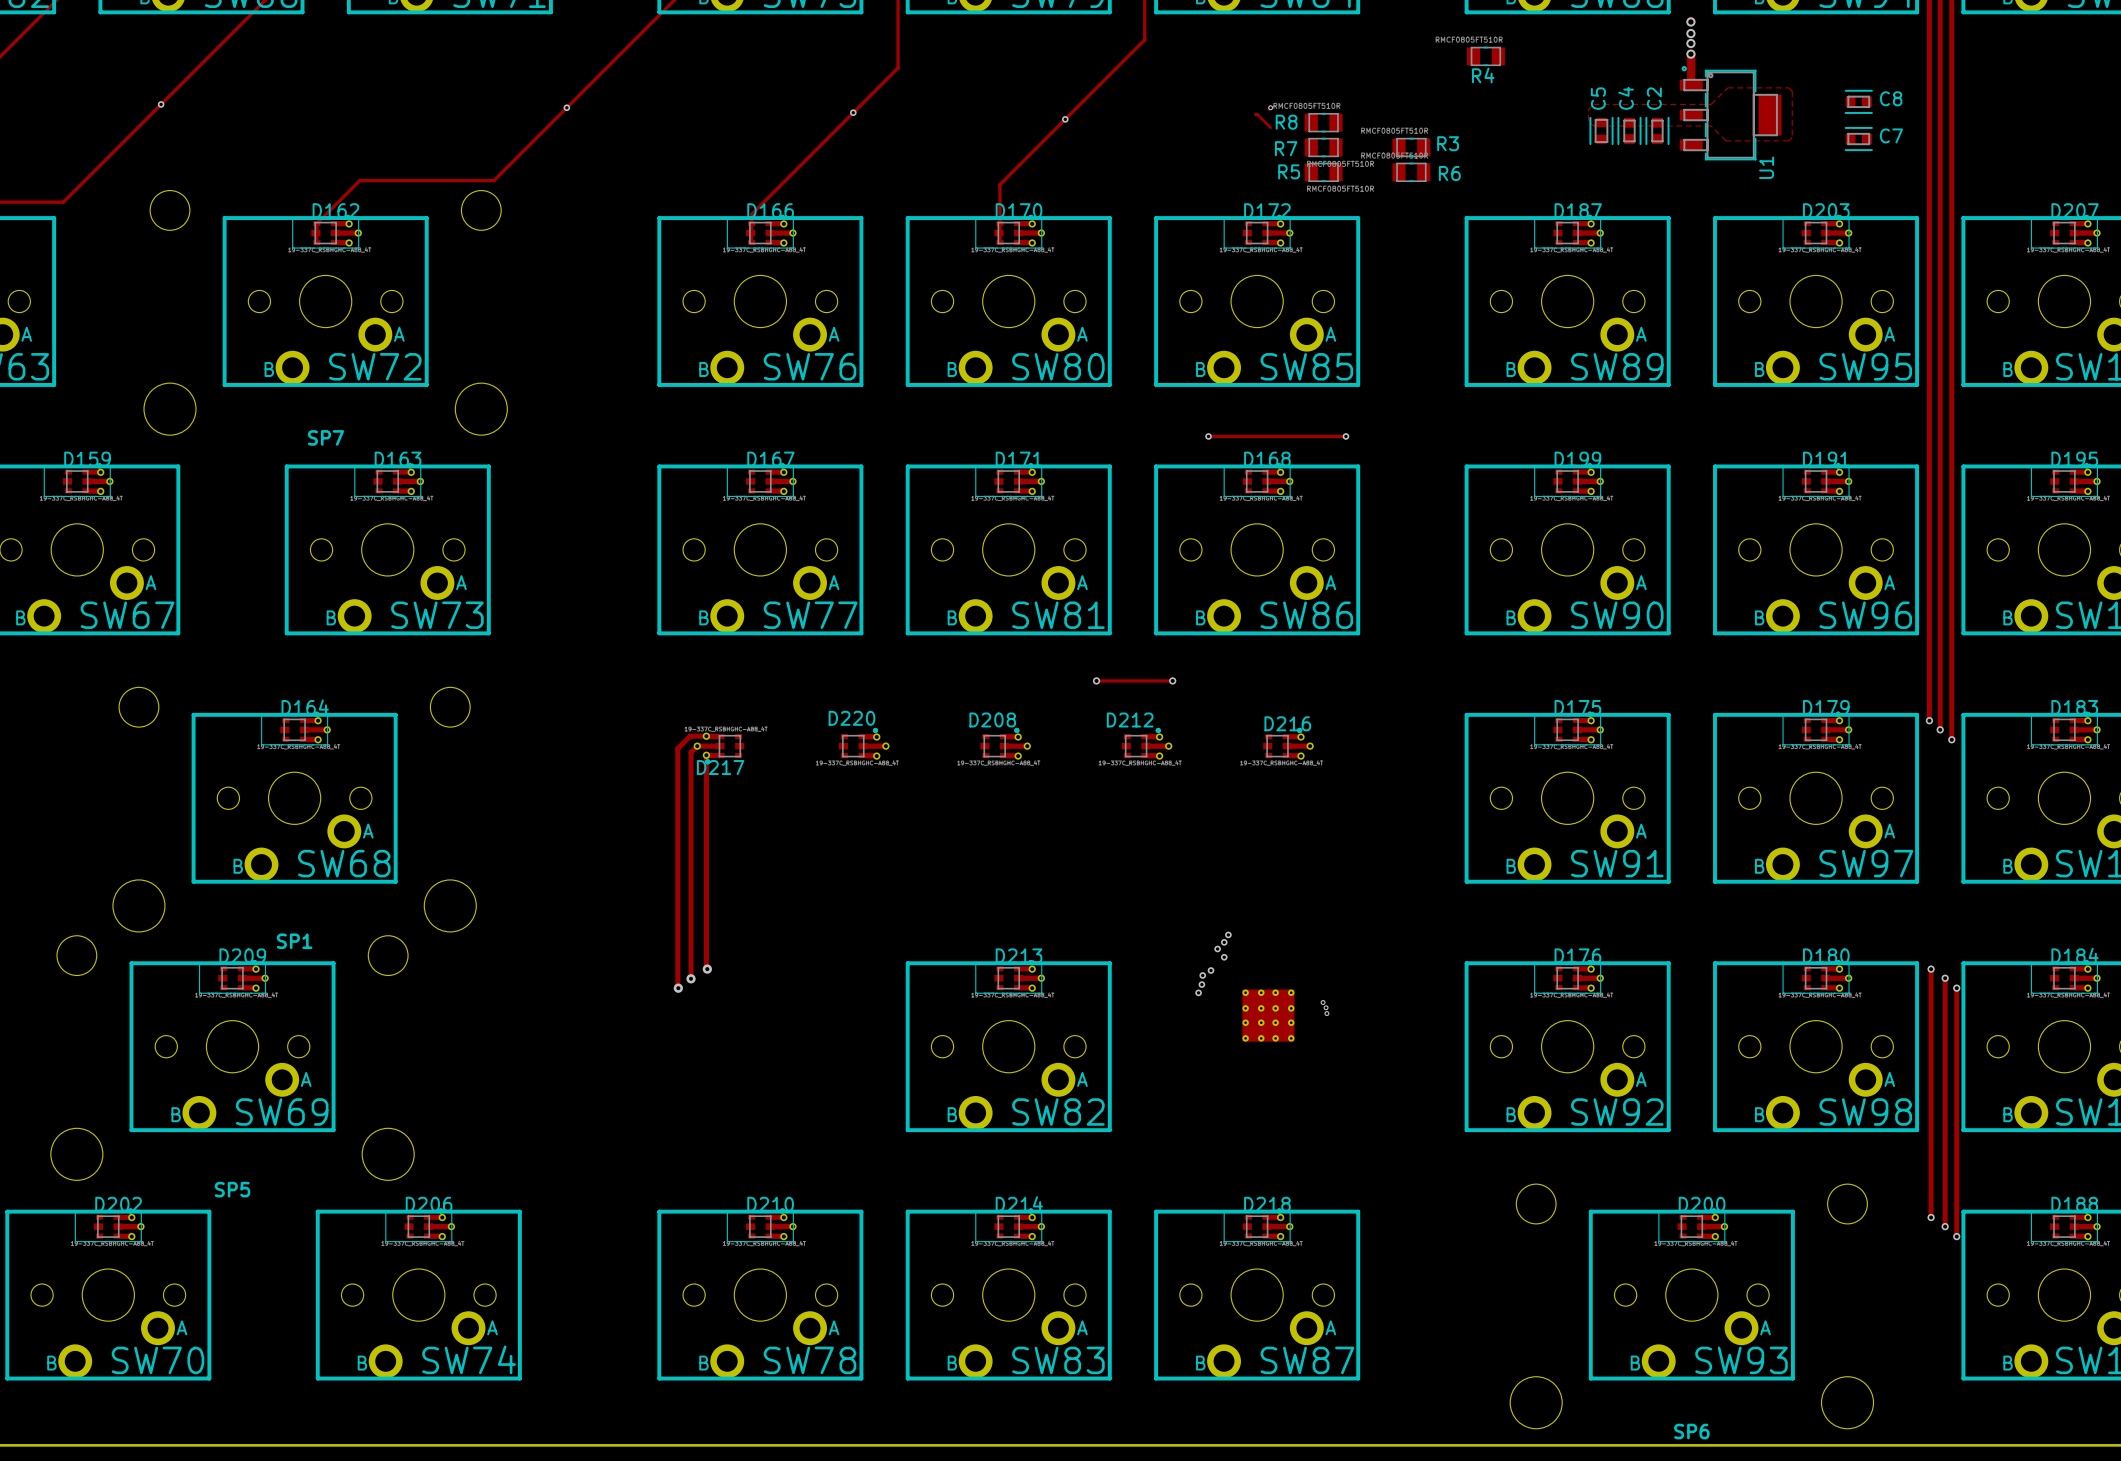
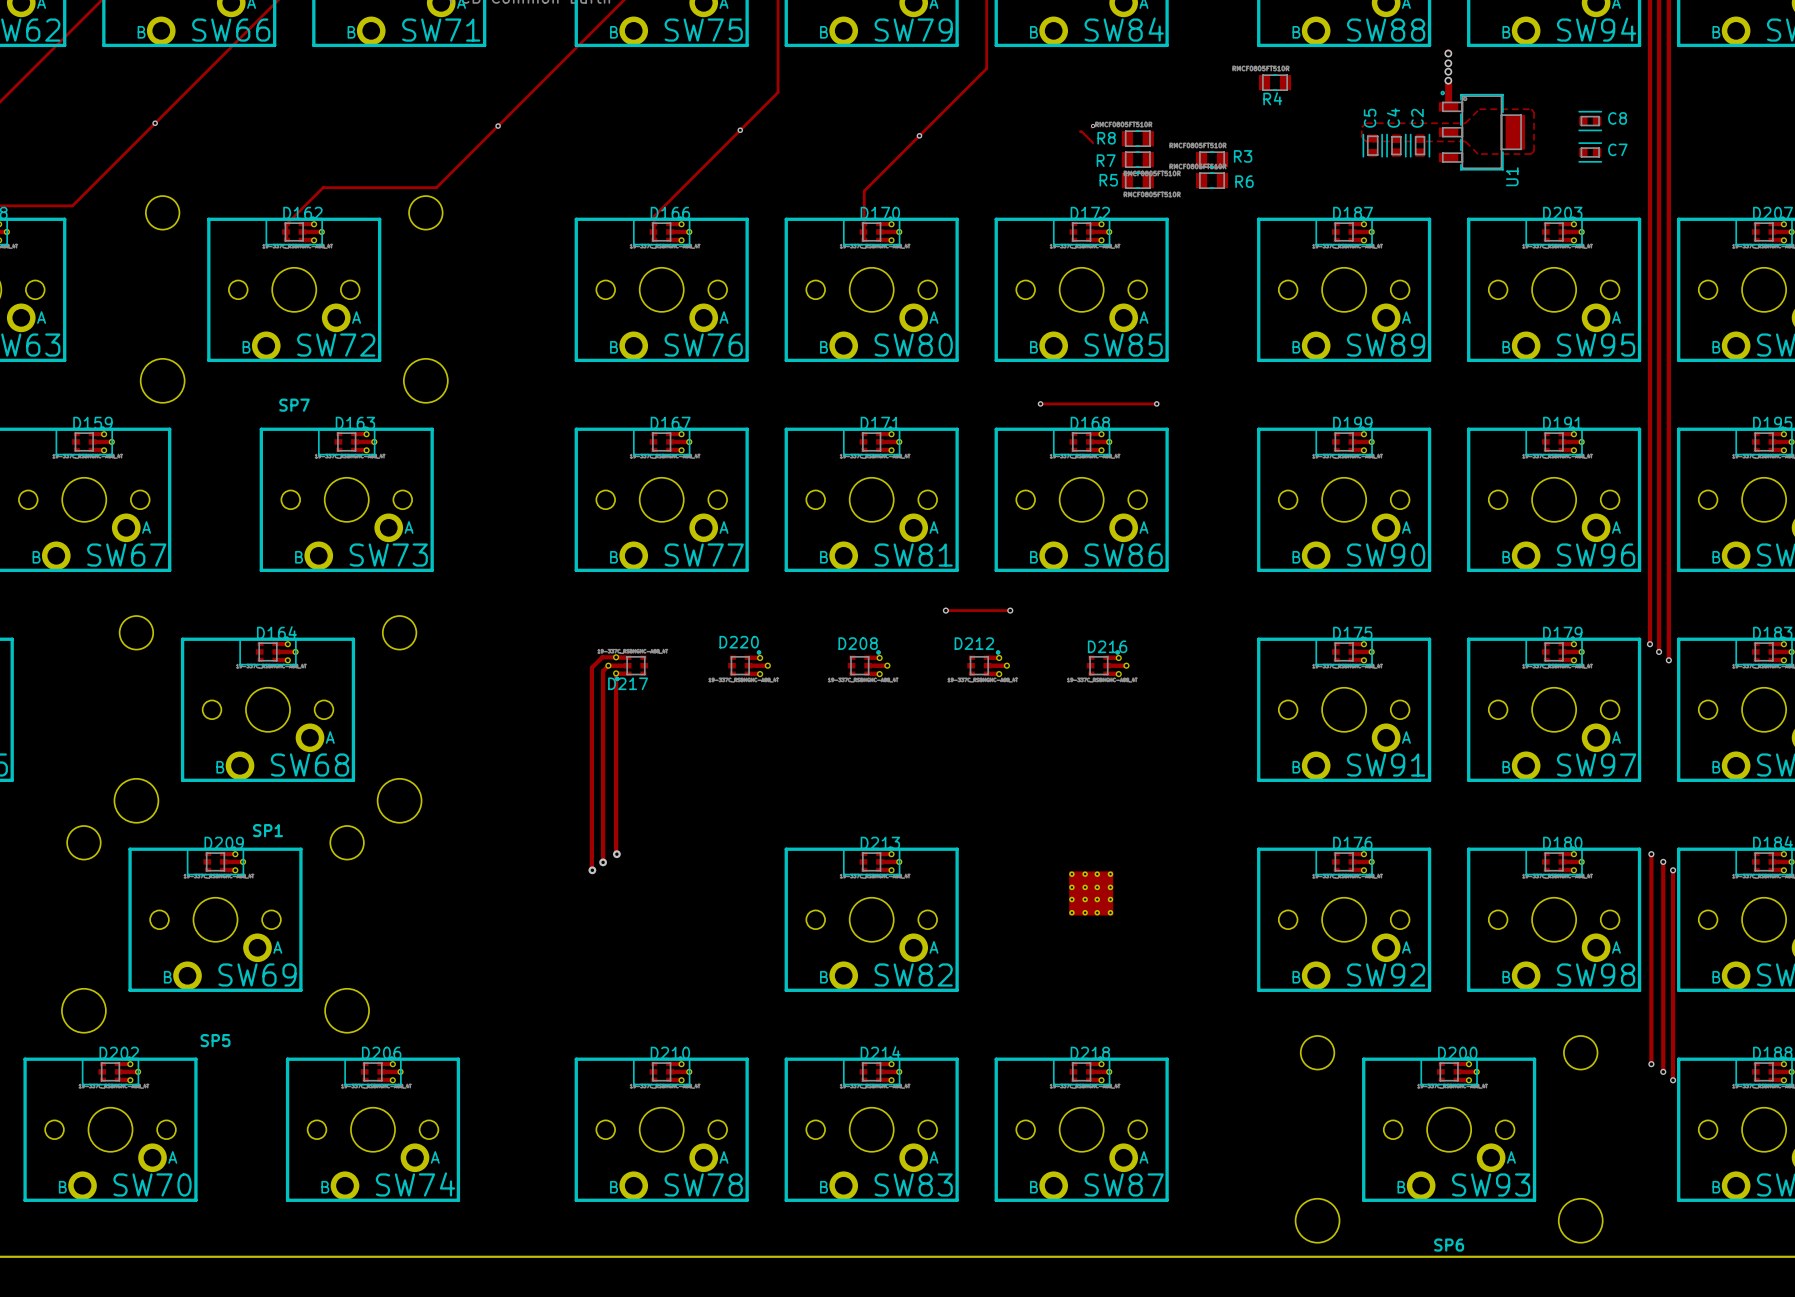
via: (1228, 934) -> none
via: (1224, 942) -> none
via: (1217, 948) -> none
via: (1224, 957) -> none
via: (1211, 970) -> none
via: (1202, 975) -> none
via: (1201, 984) -> none
via: (1198, 992) -> none
via: (1323, 1002) -> none
via: (1326, 1007) -> none
via: (1326, 1013) -> none

